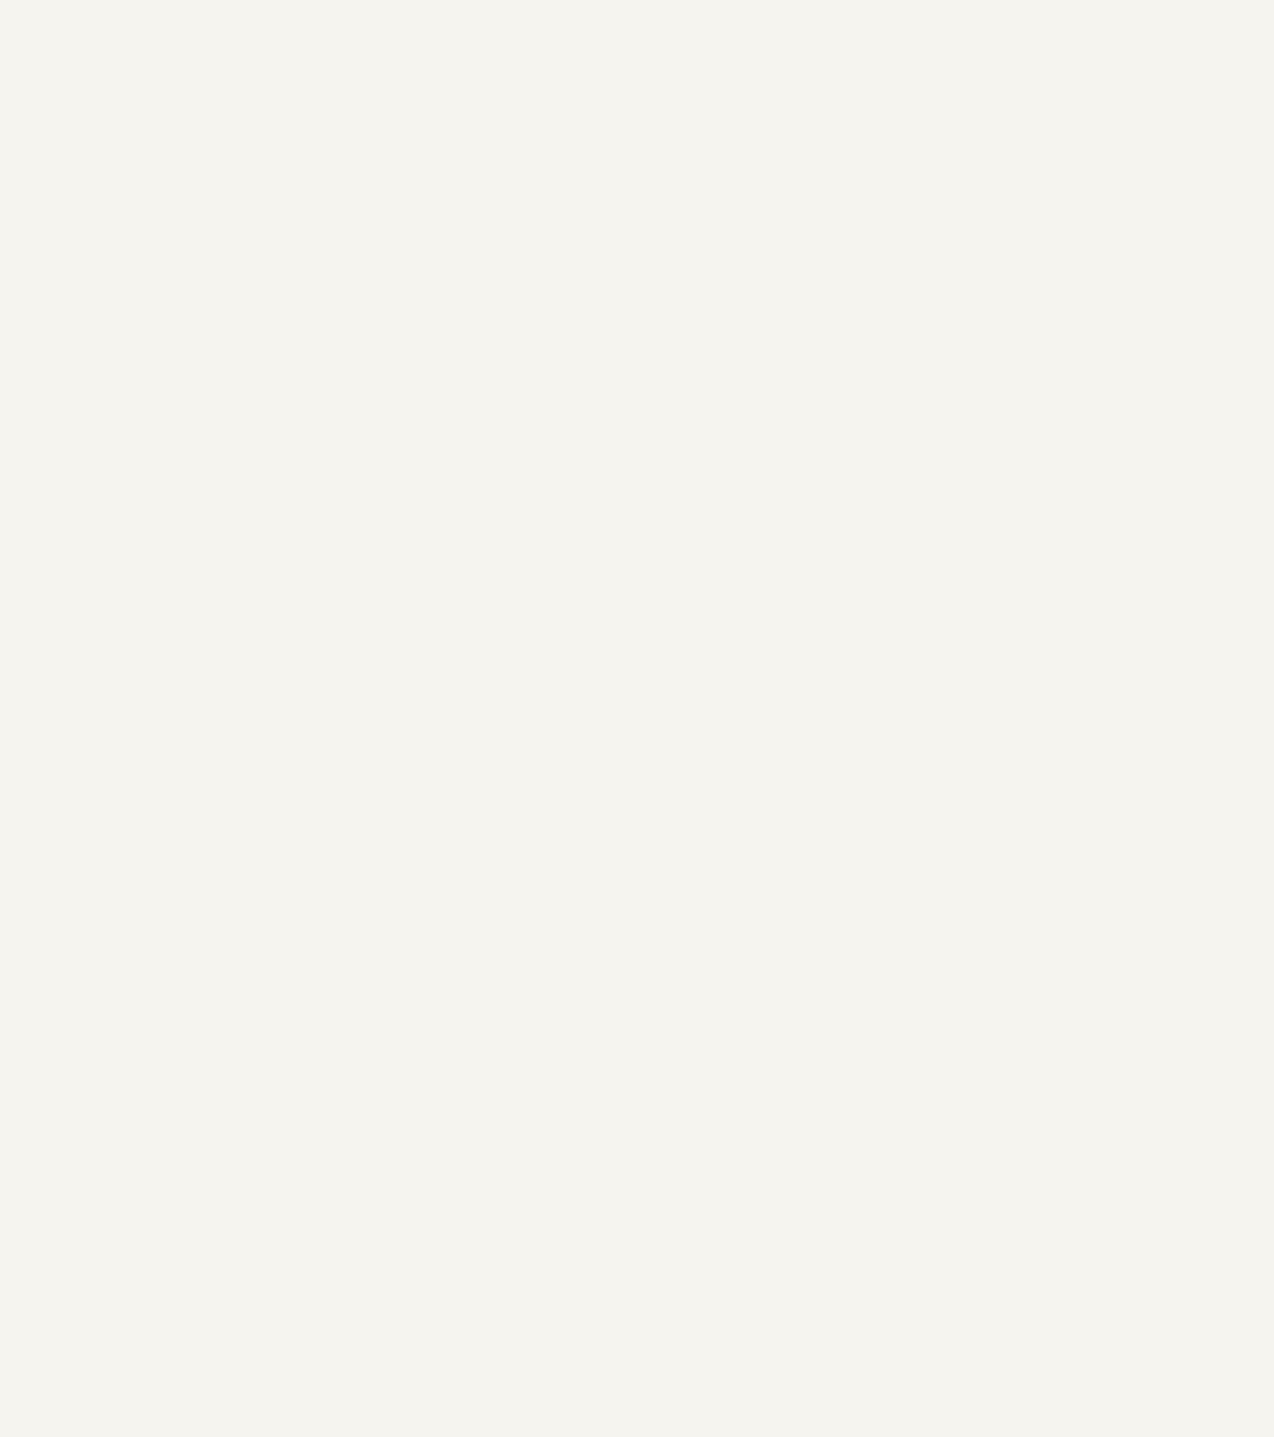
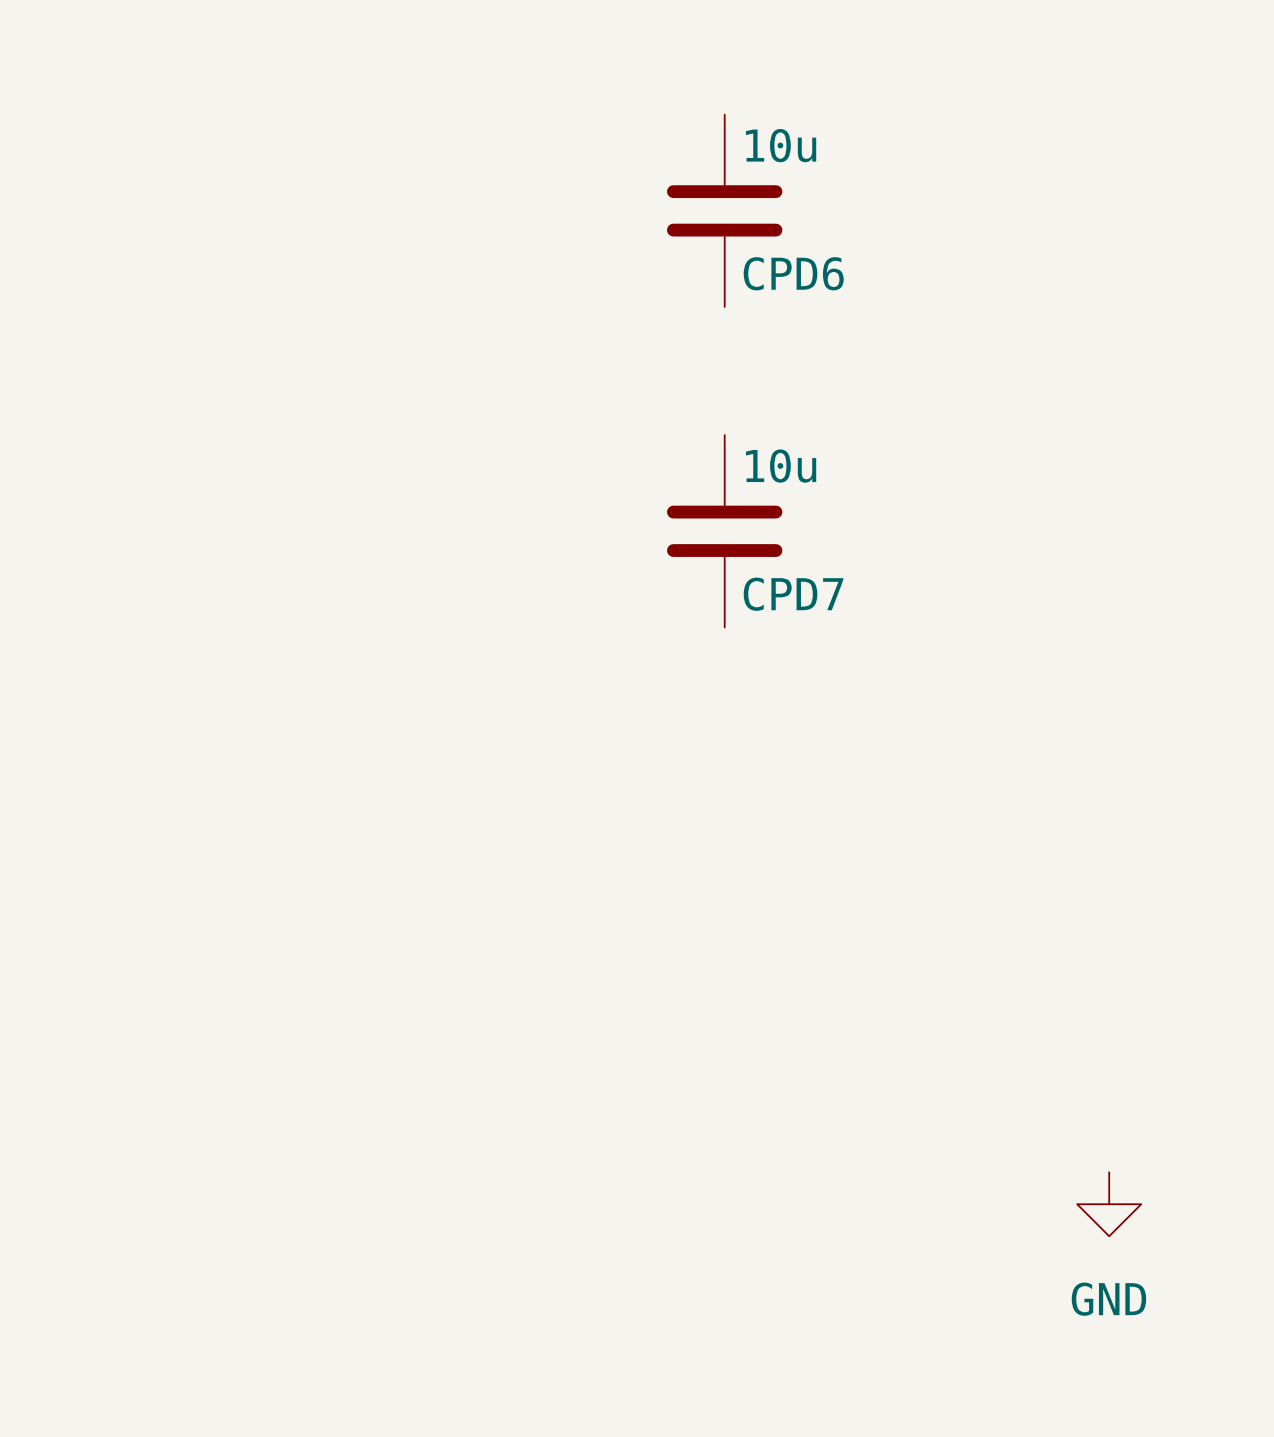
CPD6: none -> 10u (724, 210)
CPD7: none -> 10u (724, 531)
power symbol: none -> GND (1109, 1204)

